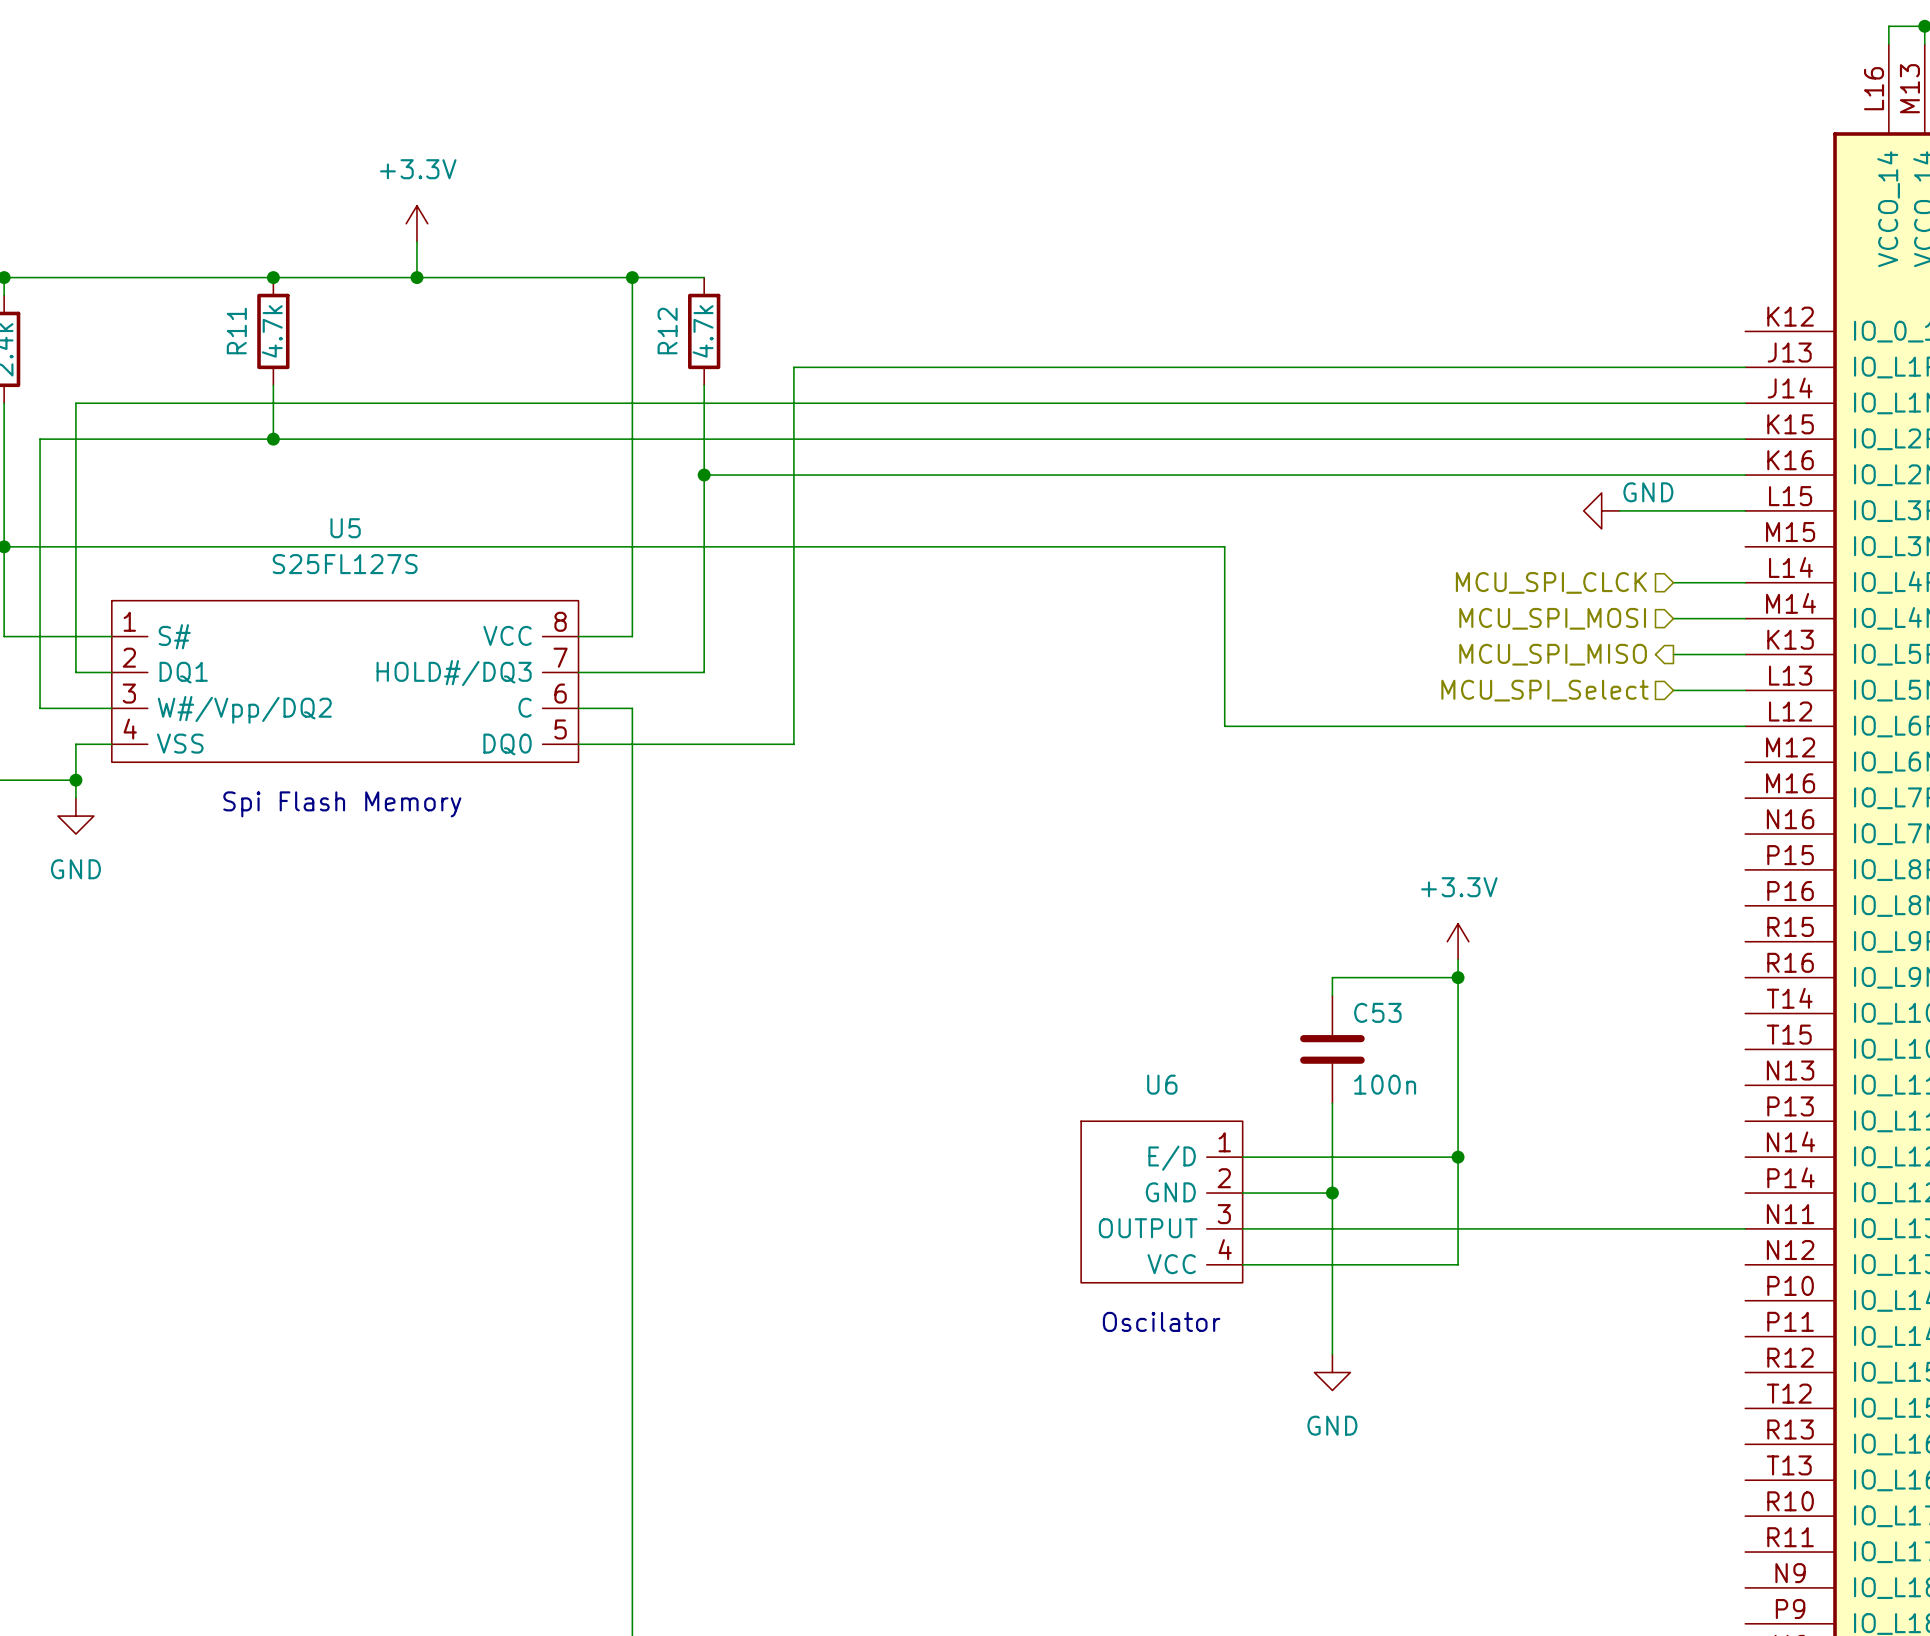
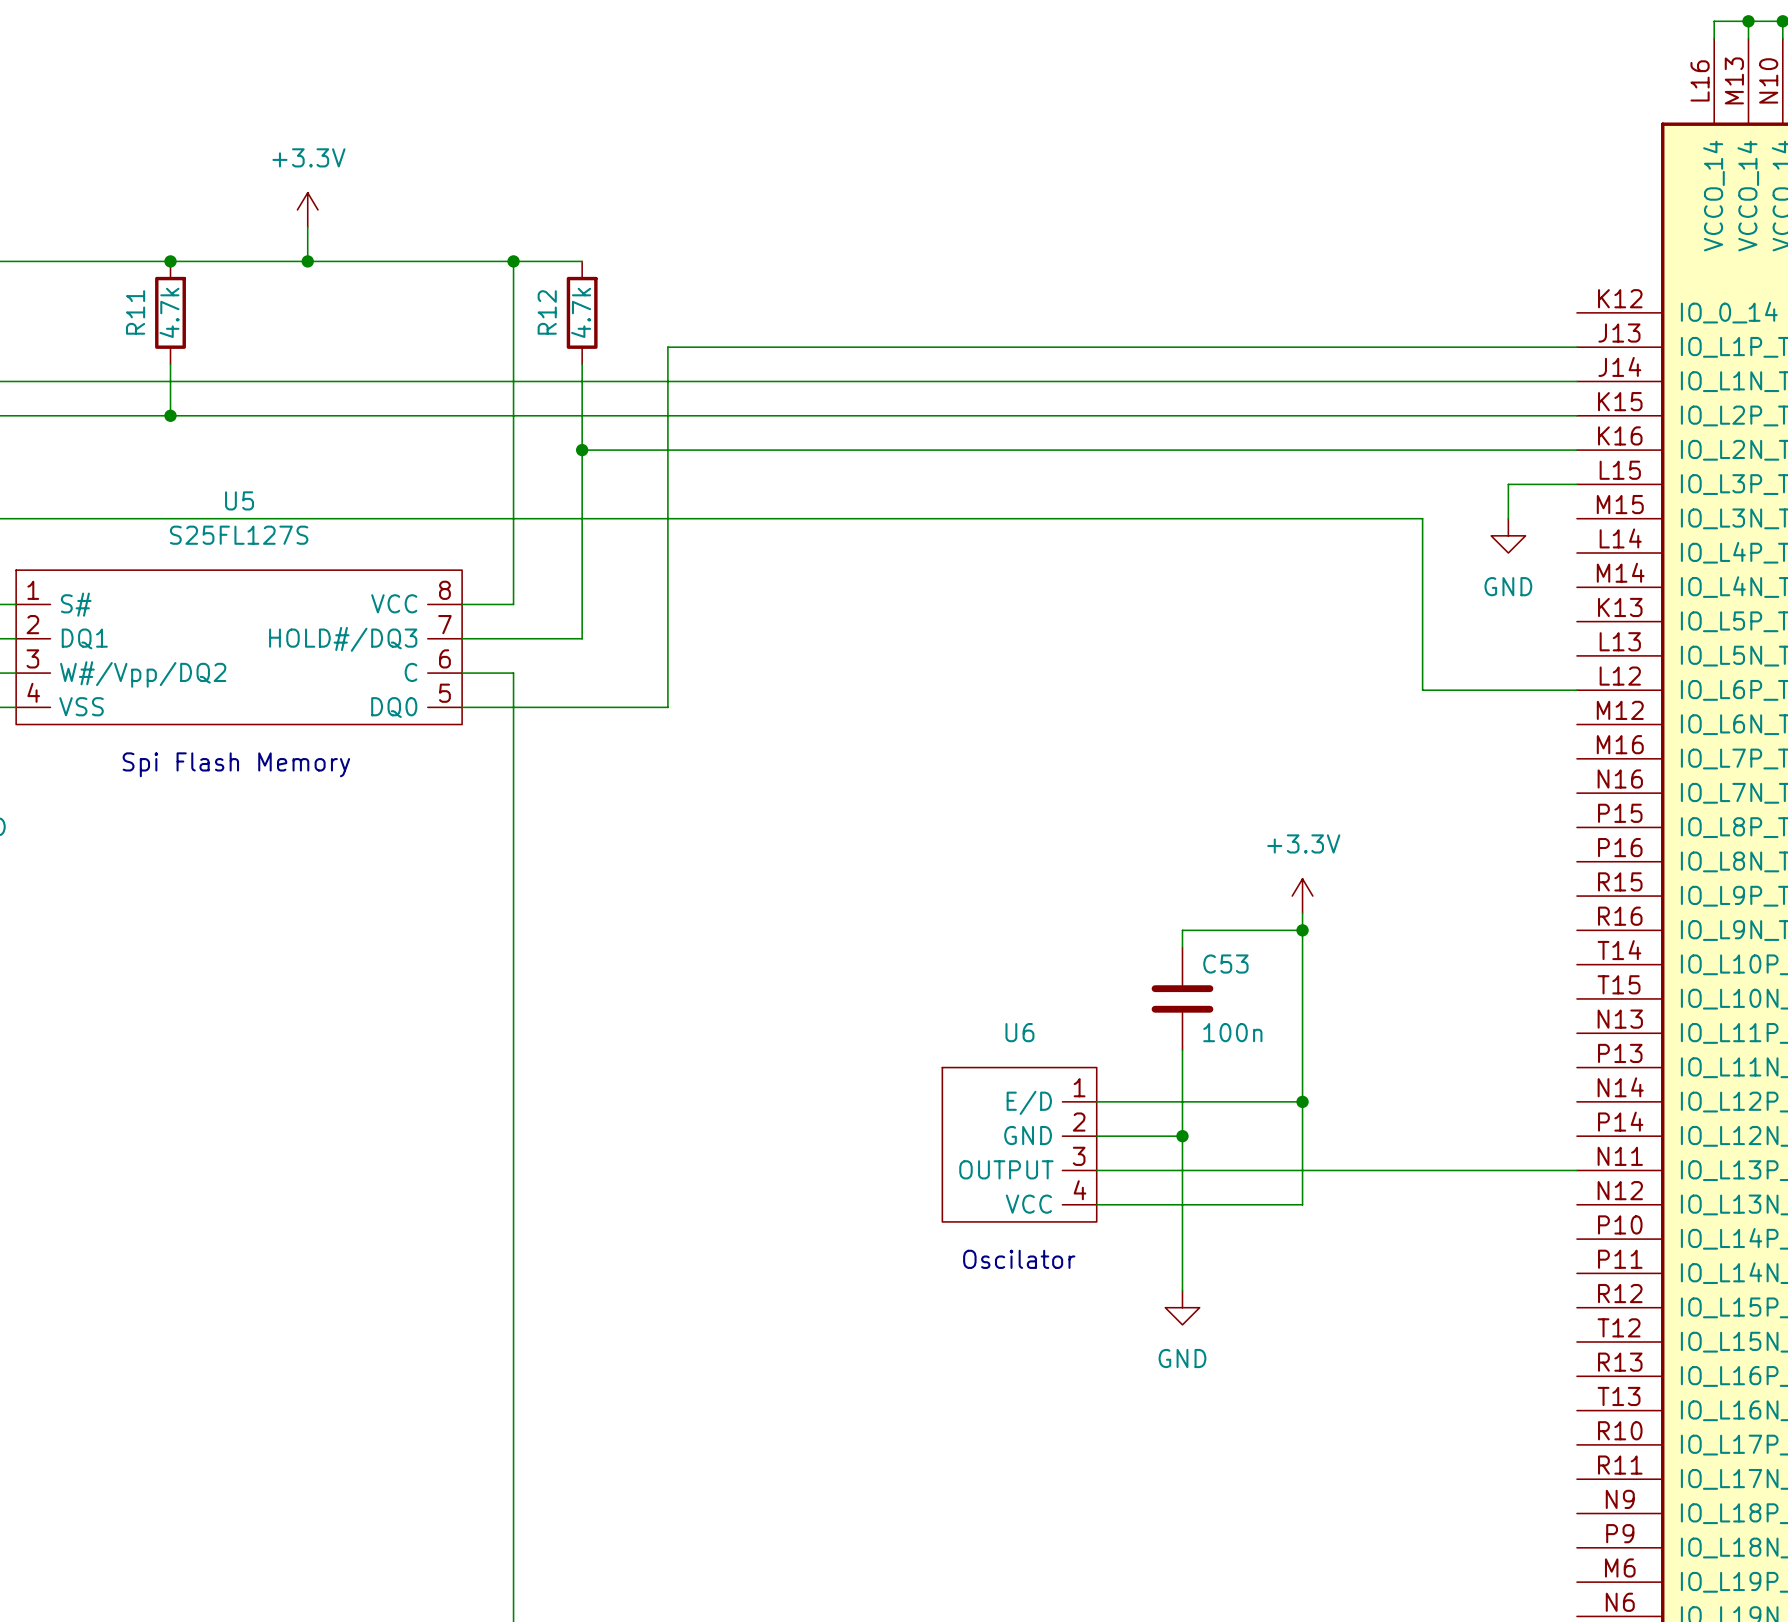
power symbol text position: GND (1648, 492) -> GND (1508, 586)
power symbol rotation: 0° (1601, 510) -> 90° counterclockwise (1508, 535)
power symbol position: GND (1601, 510) -> GND (1508, 535)
wire: (1619, 510) (1673, 510) -> (1508, 518) (1508, 484)
wire: (1224, 546) (1224, 726) (1583, 726) -> (1079, 518) (1422, 518) (1422, 690)
hierarchical label: MCU_SPI_CLCK (1551, 582) -> none
wire: (1673, 582) (1745, 582) -> none
hierarchical label: MCU_SPI_MOSI (1552, 618) -> none
wire: (1673, 618) (1745, 618) -> none
hierarchical label: MCU_SPI_MISO (1553, 654) -> none
wire: (1673, 654) (1745, 654) -> none
hierarchical label: MCU_SPI_Select (1544, 690) -> none
wire: (1673, 690) (1745, 690) -> none

